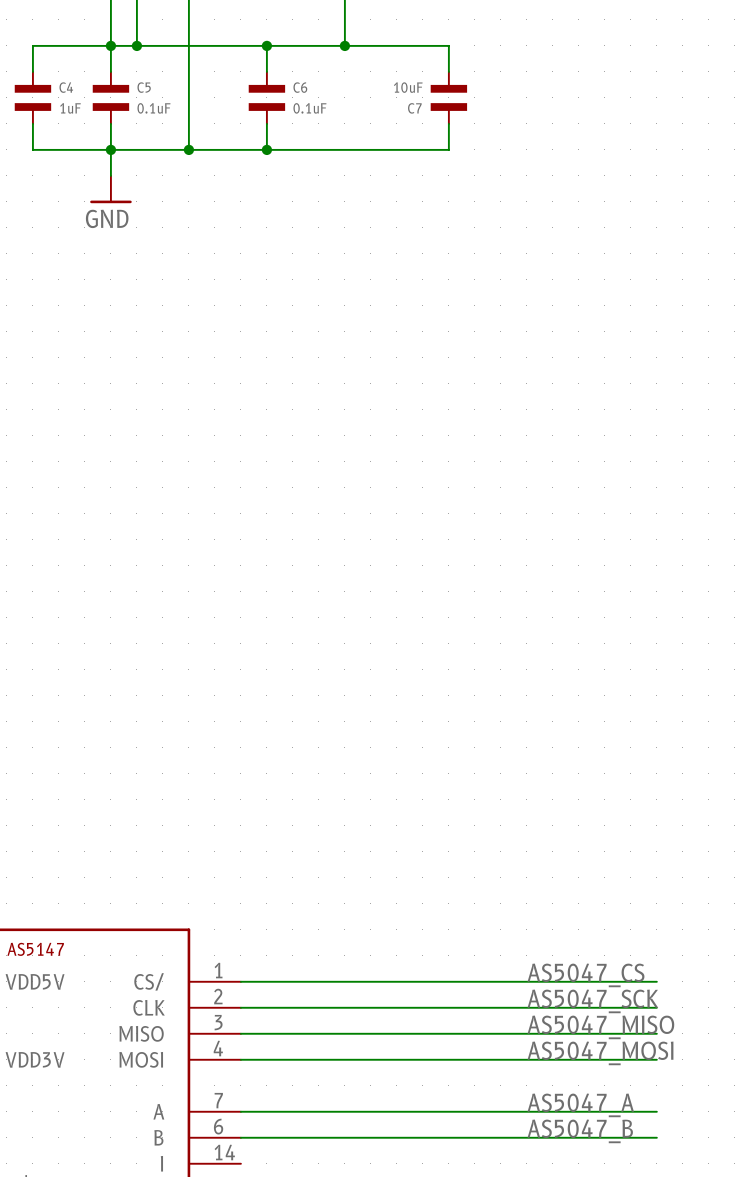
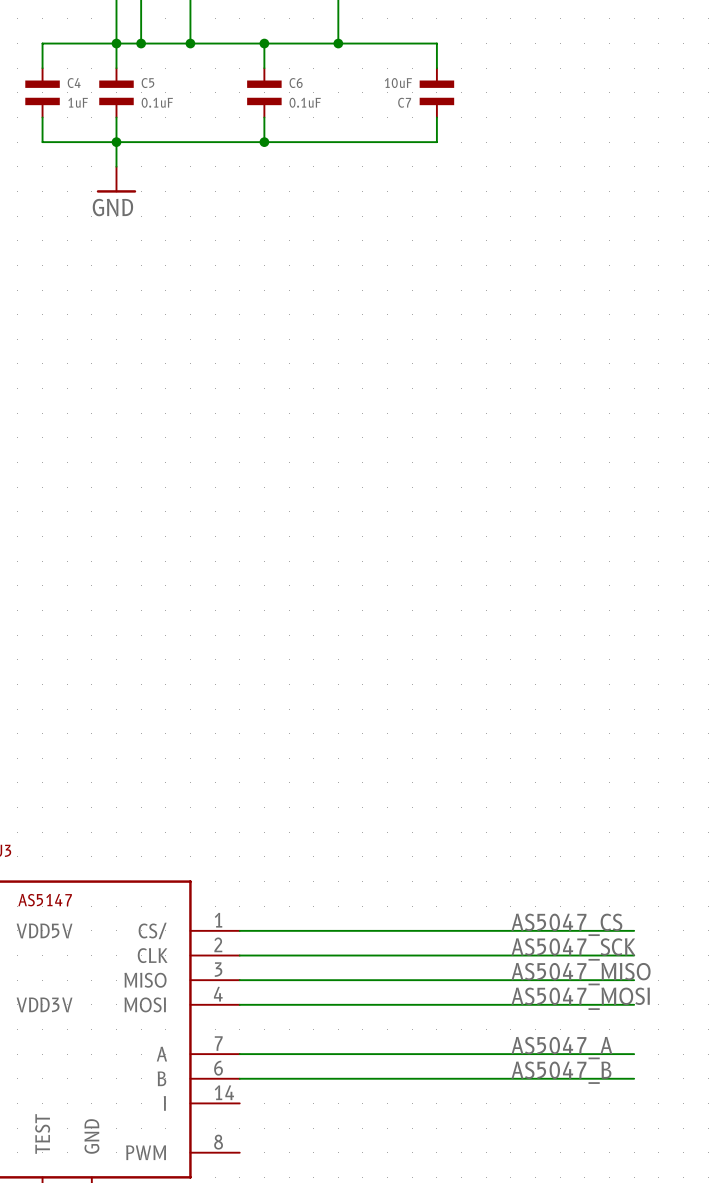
wire: (188, 45) (188, 149) -> none
junction: none -> (190, 43)
junction: (188, 149) -> none

